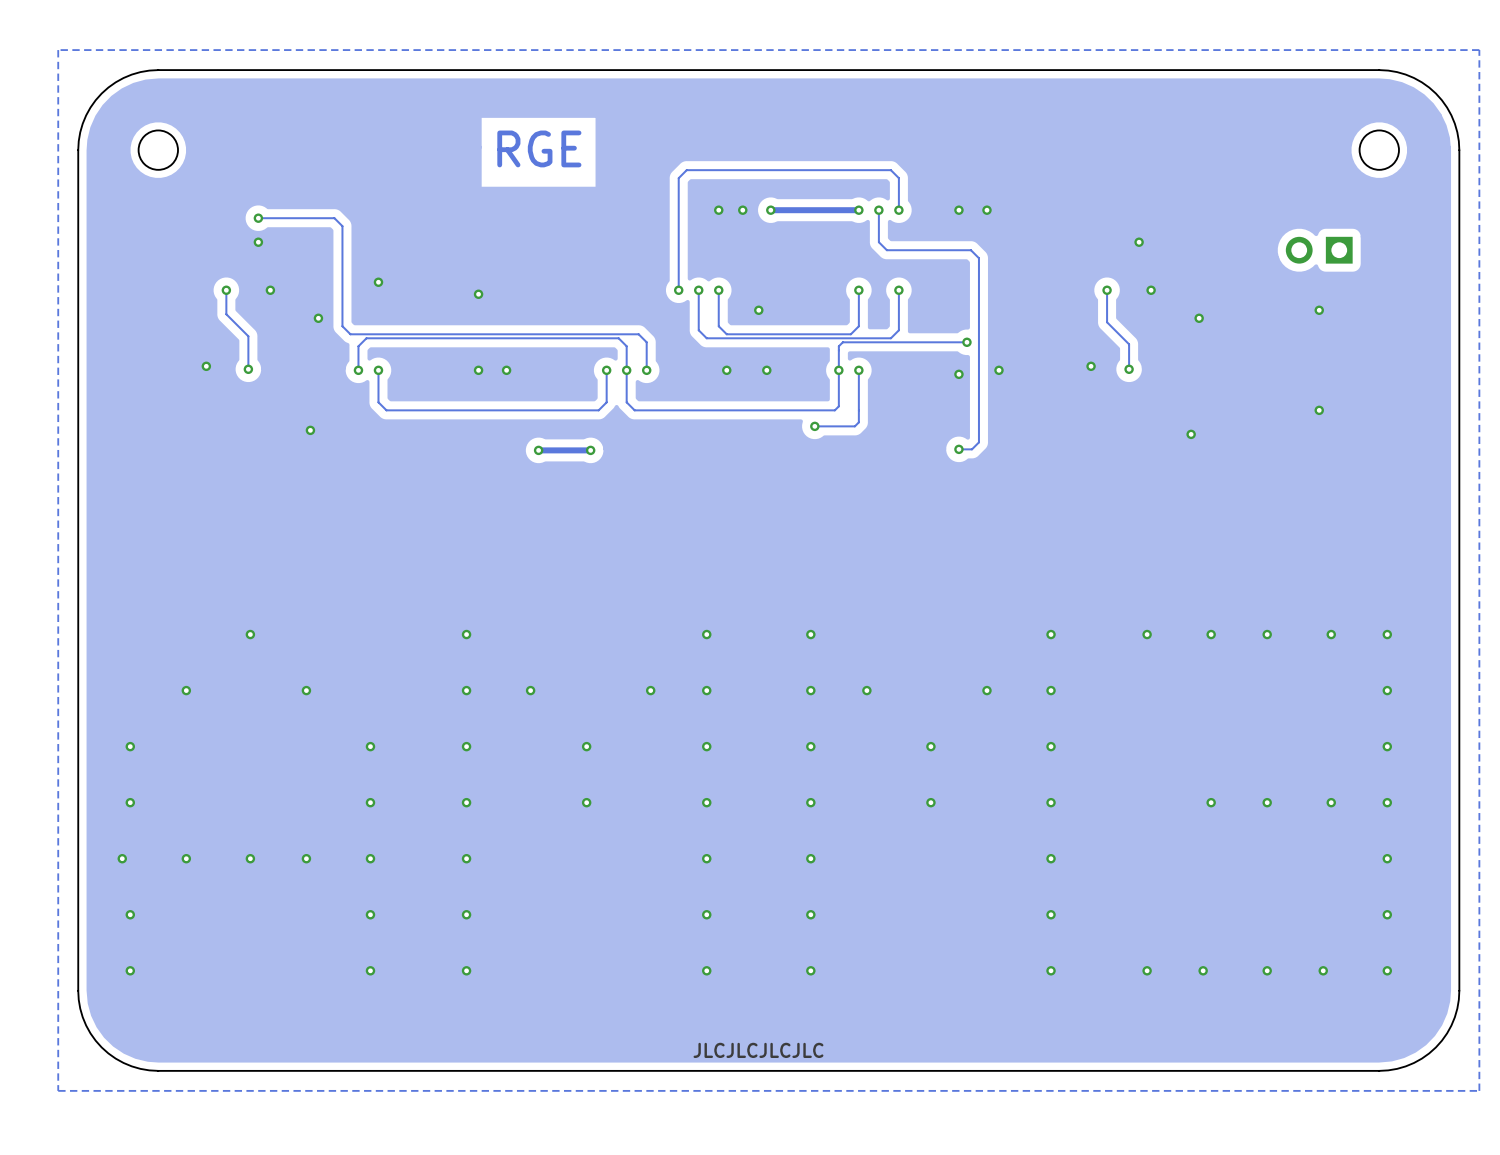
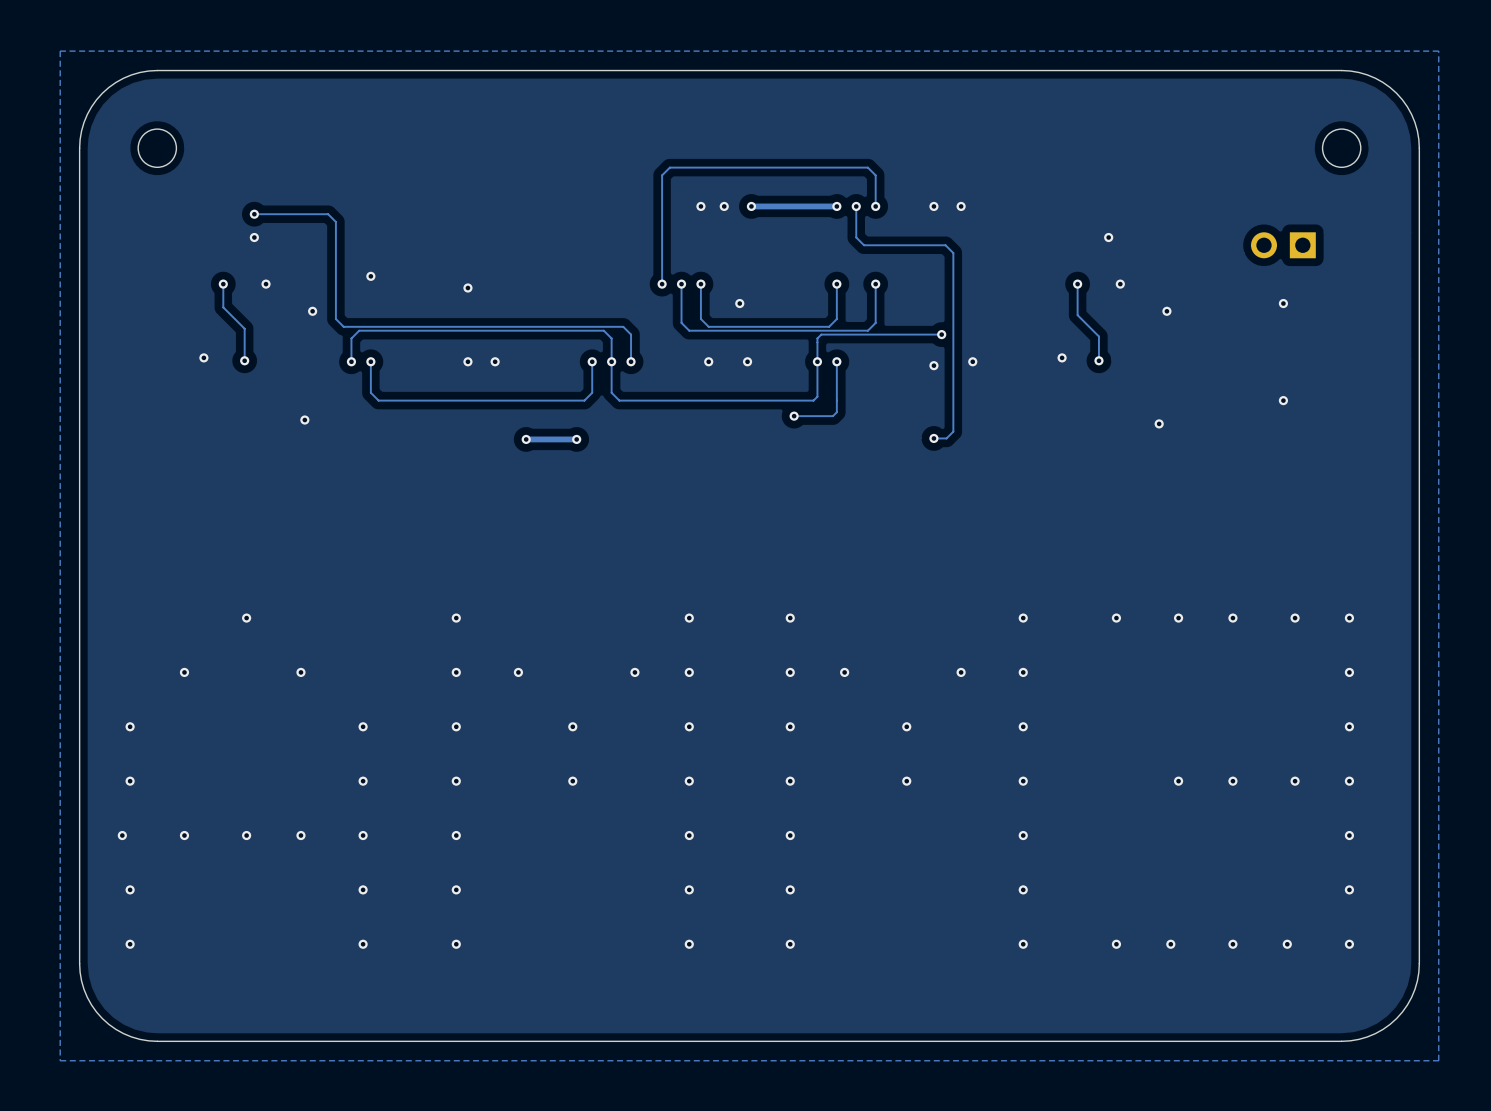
text: RGE (539, 148) -> none
text: JLCJLCJLCJLC (758, 1050) -> none

